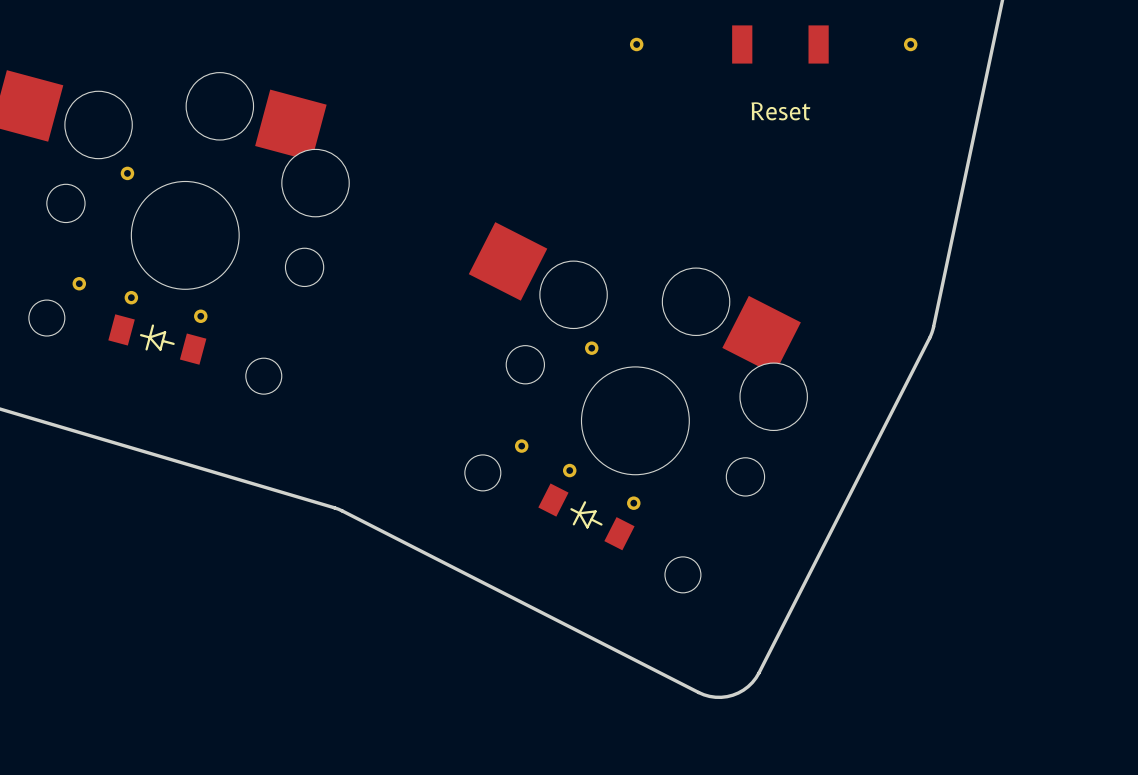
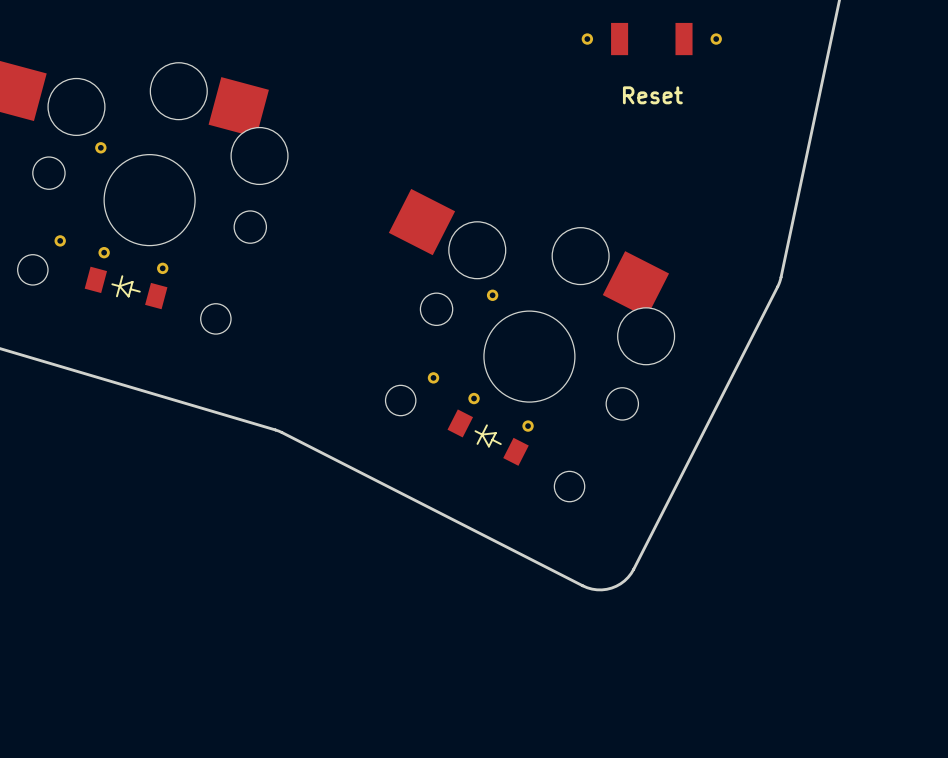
part position: (636, 44) -> (587, 39)
part position: (910, 44) -> (716, 39)

